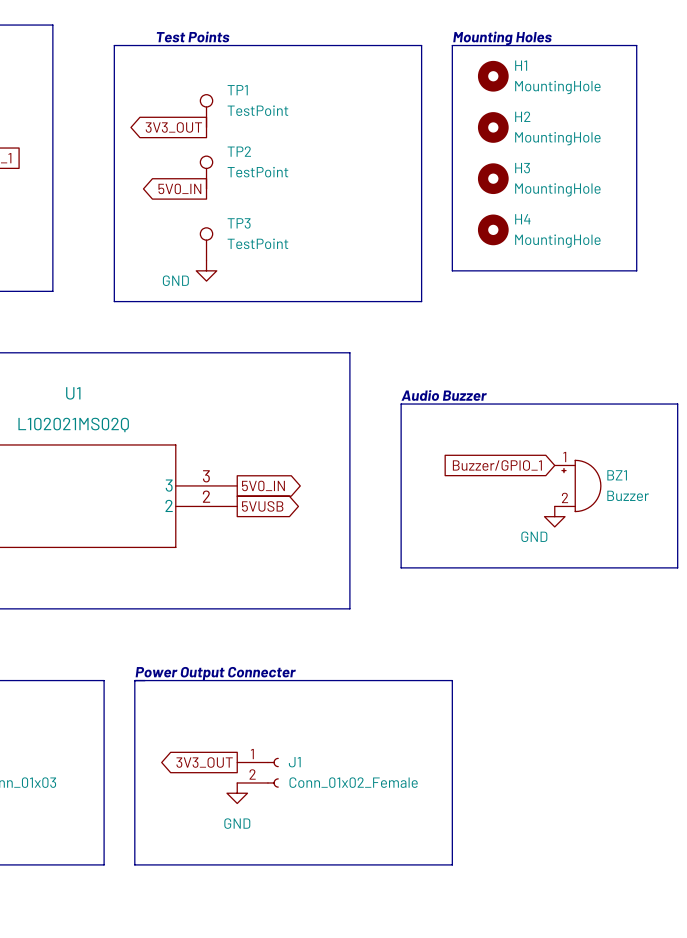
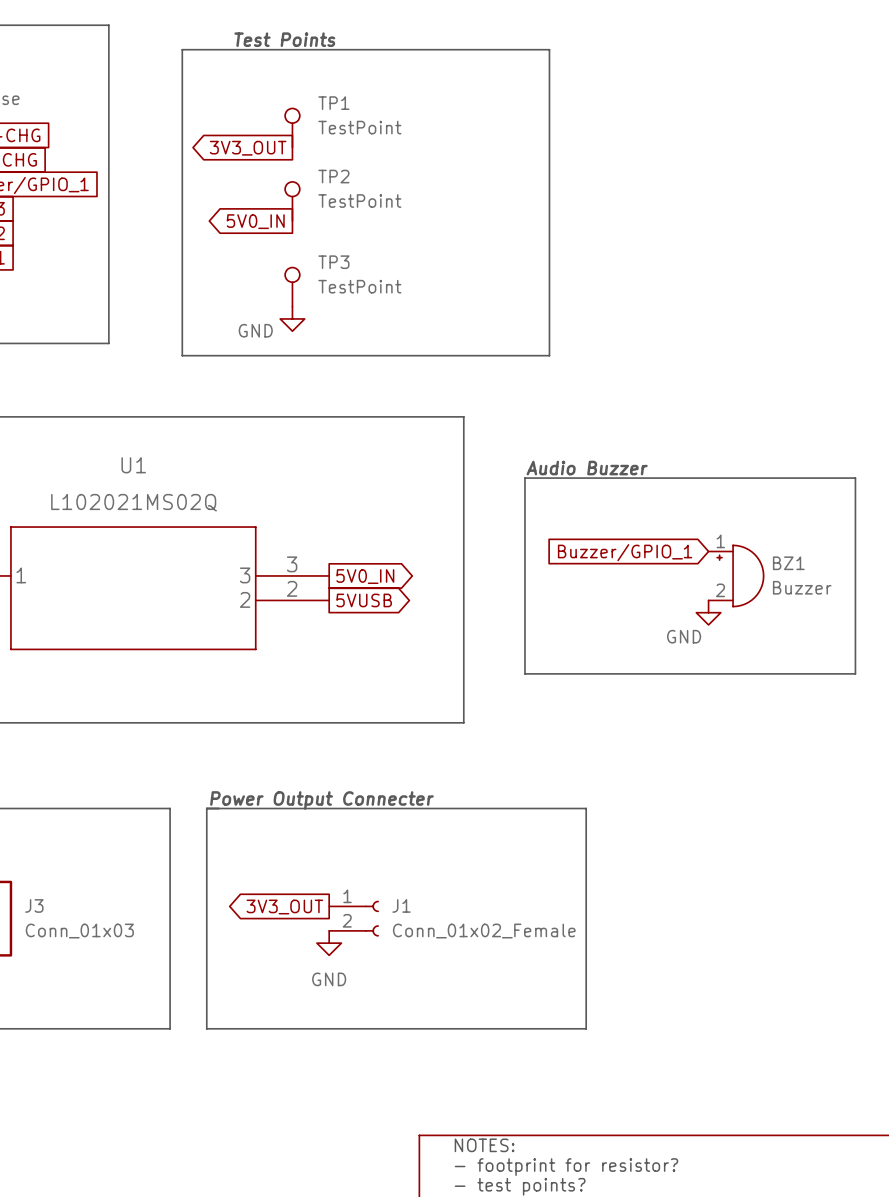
text: Mounting Holes (502, 38) -> none
line: (452, 45) (452, 270) (636, 270) (636, 45) (452, 45) -> none
H1: MountingHole (493, 76) -> none
H2: MountingHole (493, 127) -> none
H3: MountingHole (493, 178) -> none
H4: MountingHole (493, 229) -> none

